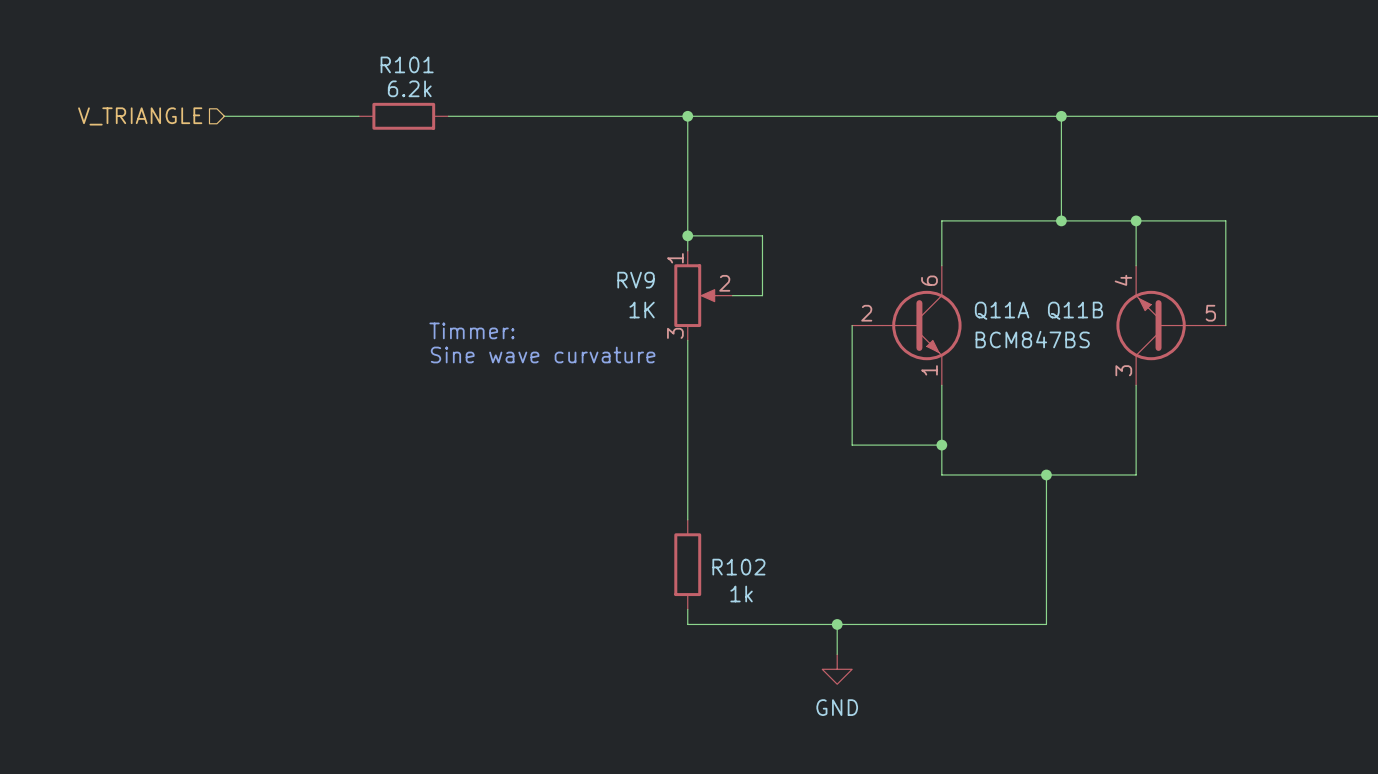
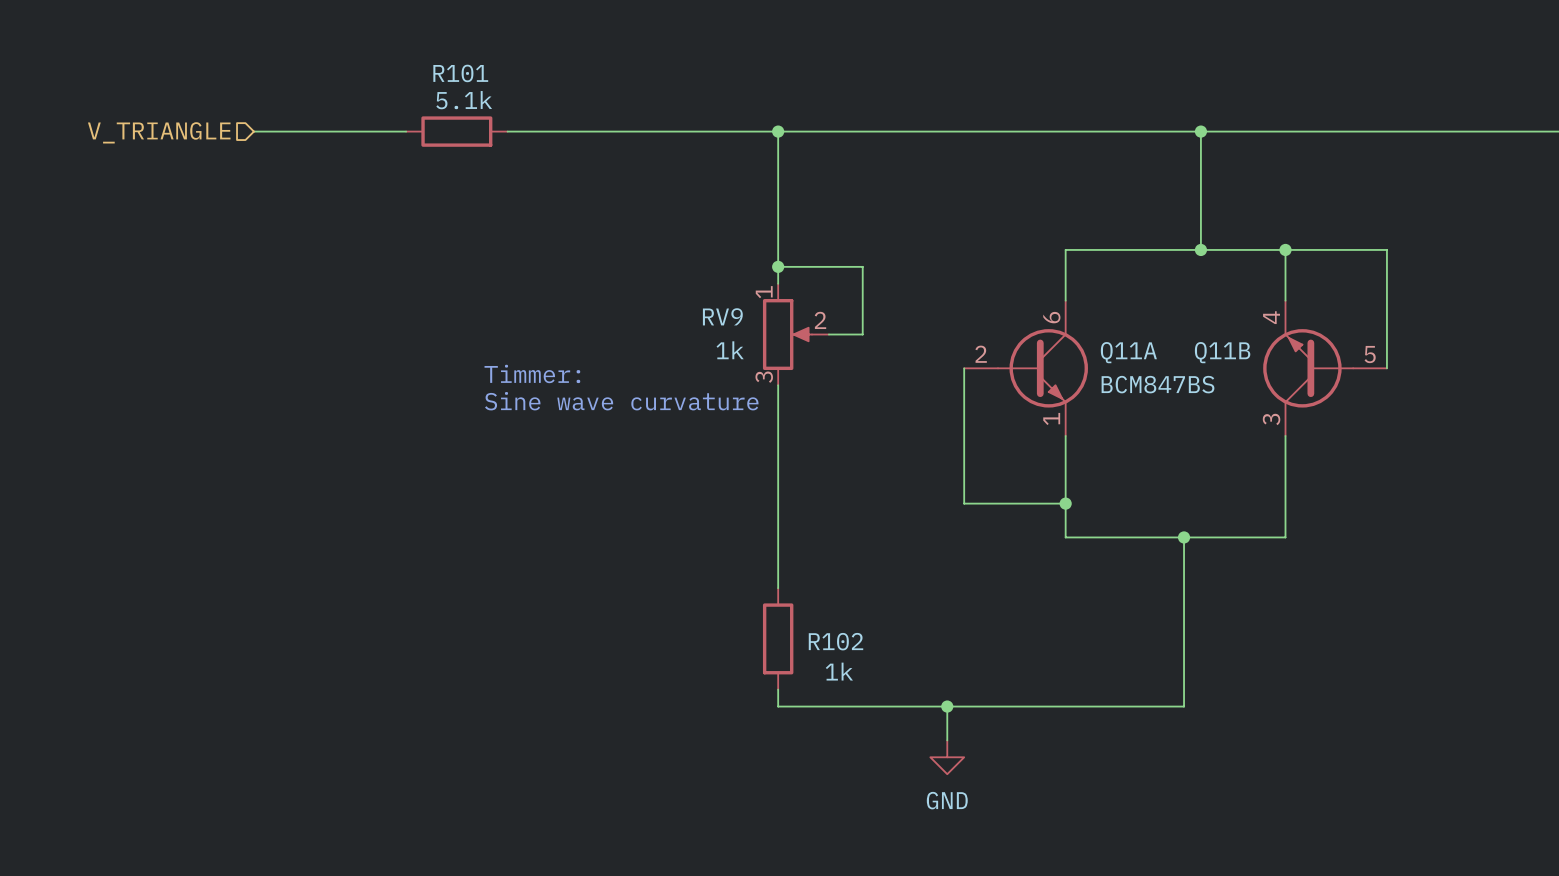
R101 value: 6.2k (409, 88) -> 5.1k (464, 100)
RV9 value: 1K (642, 310) -> 1k (730, 350)

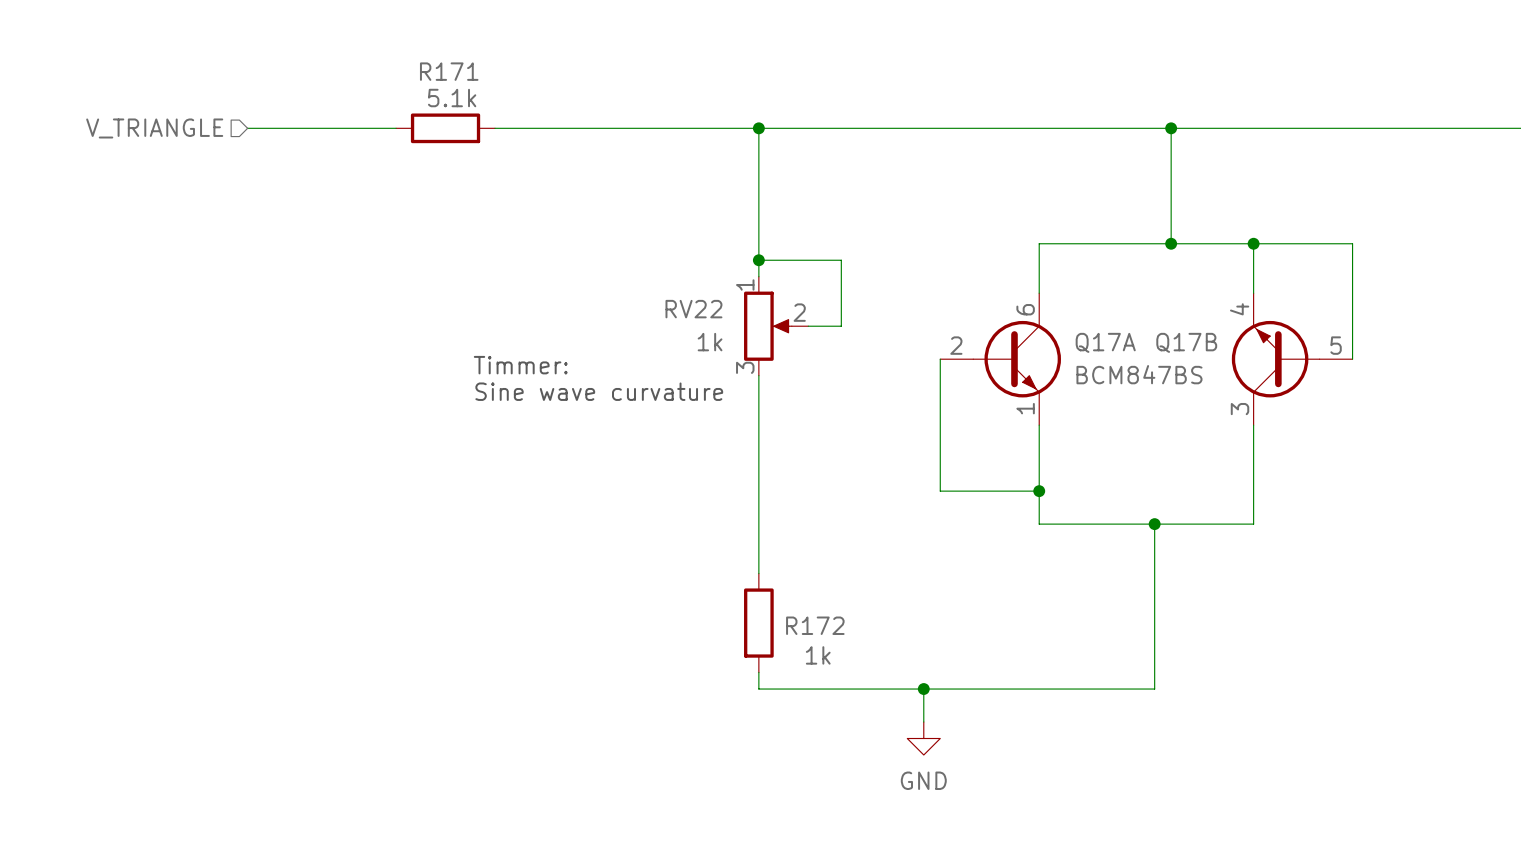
R101 name: R101 (460, 73) -> R171 (449, 71)
RV9 name: RV9 (722, 316) -> RV22 (693, 309)
Q11A name: Q11A (1128, 352) -> Q17A (1105, 342)
Q11B name: Q11B (1222, 352) -> Q17B (1186, 342)
R102 name: R102 (835, 641) -> R172 (815, 625)

